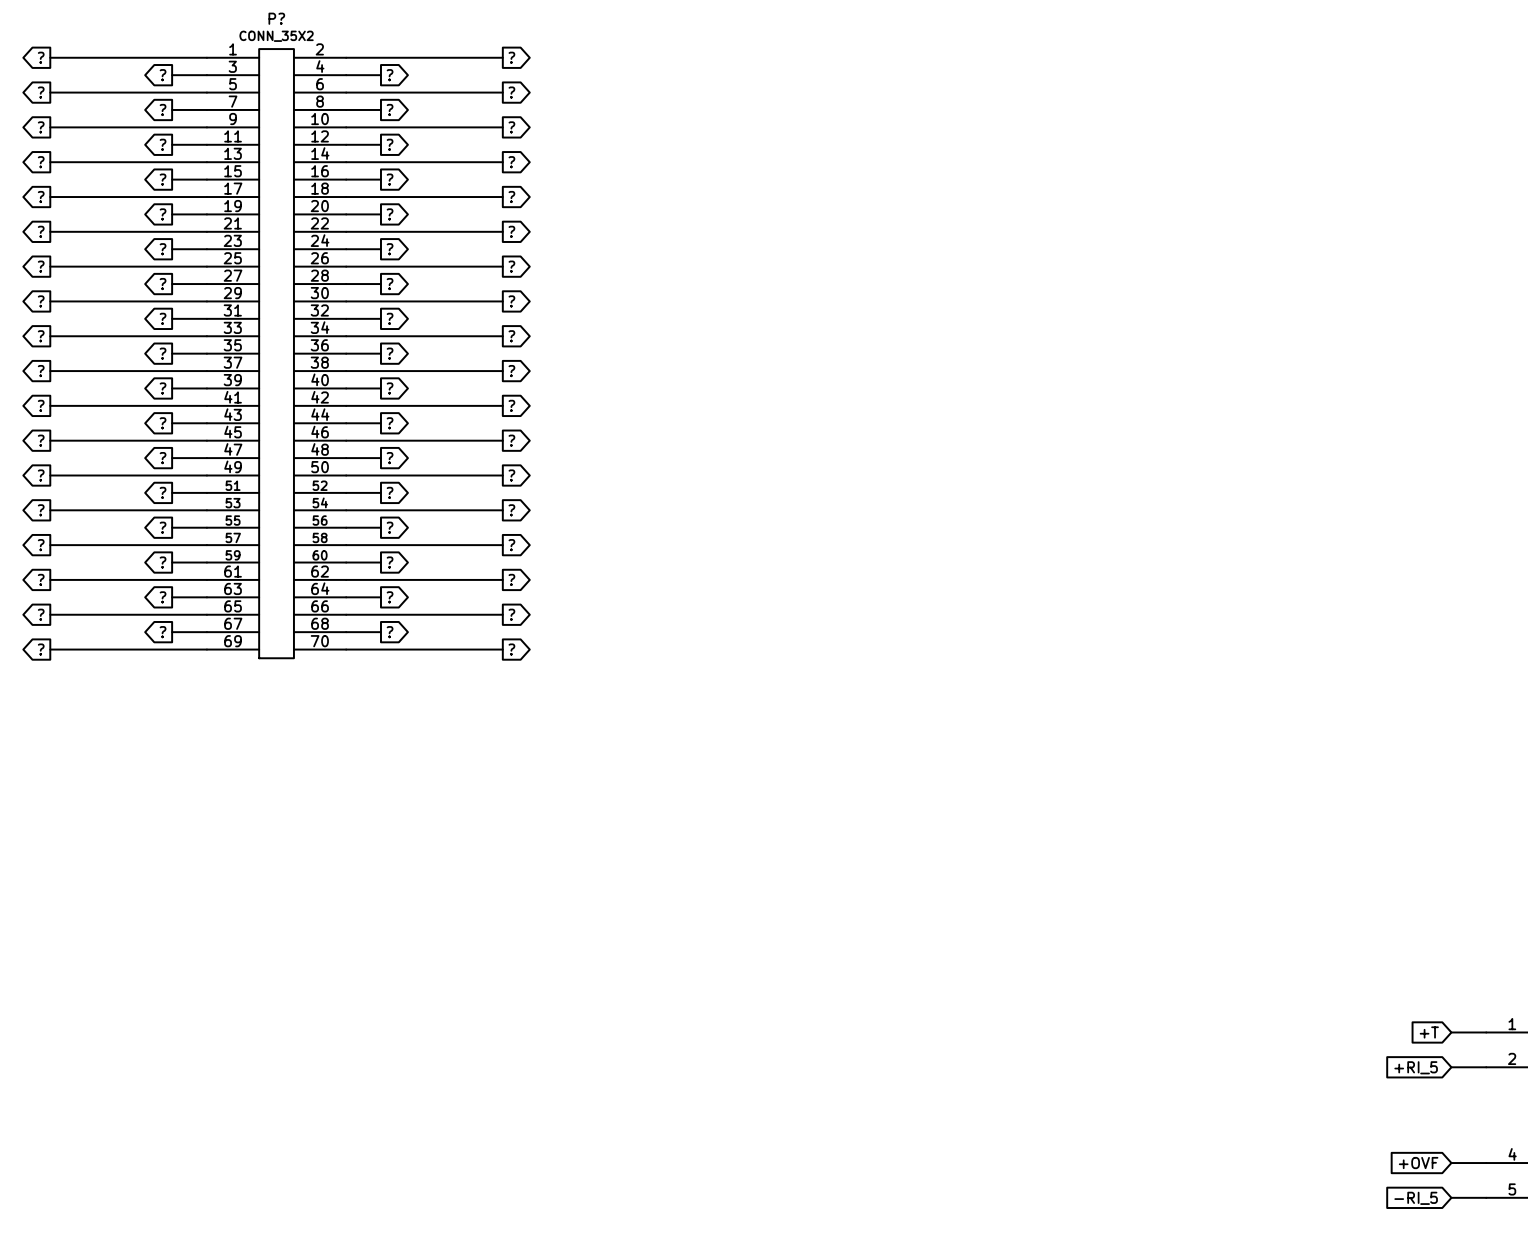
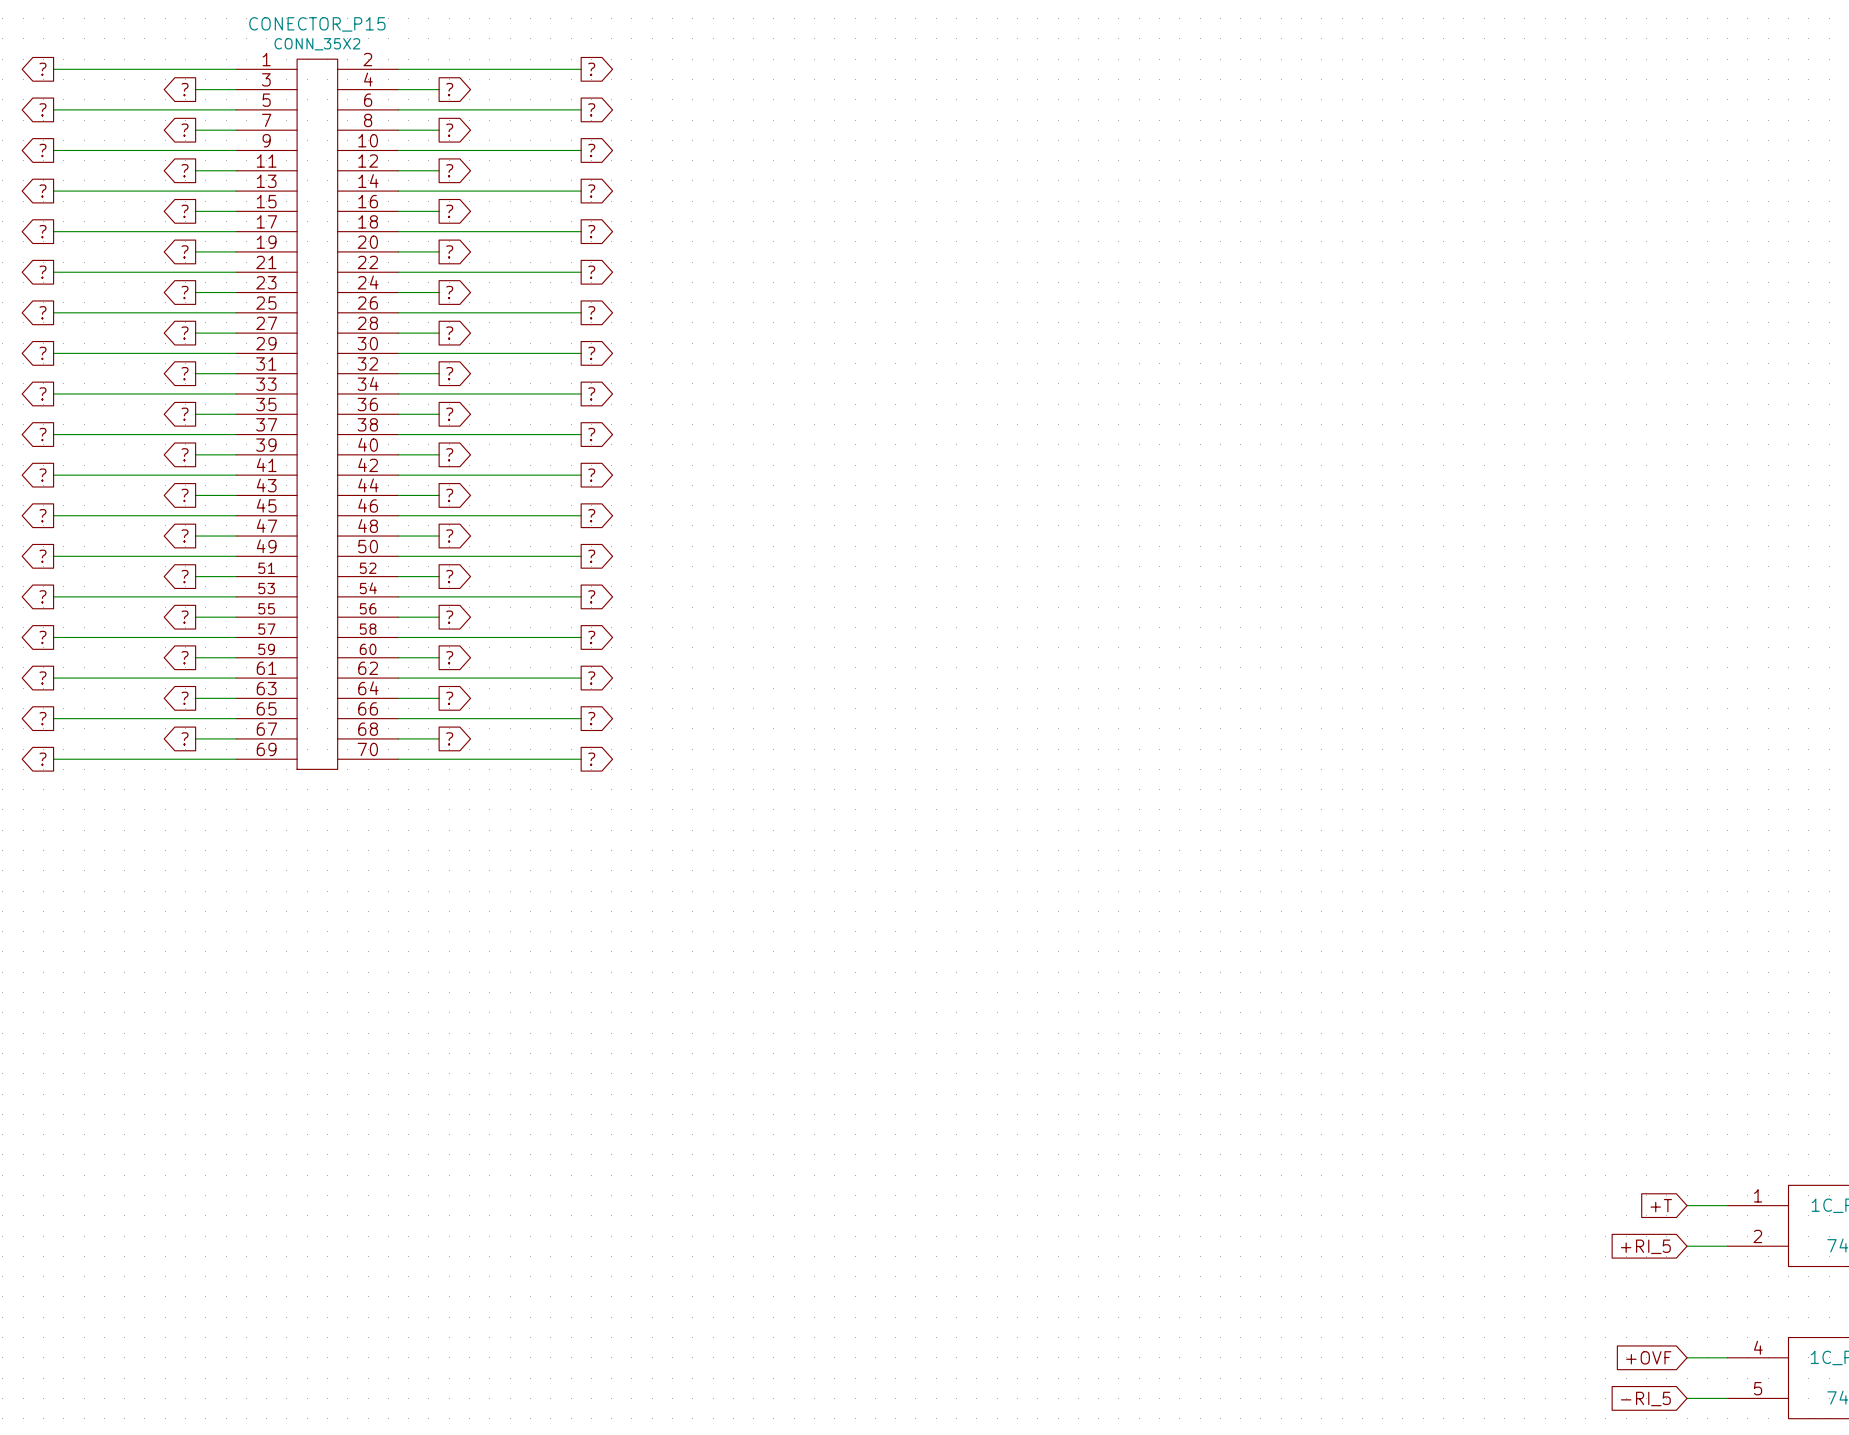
P? name: P? (276, 18) -> CONECTOR_P15 (317, 24)

